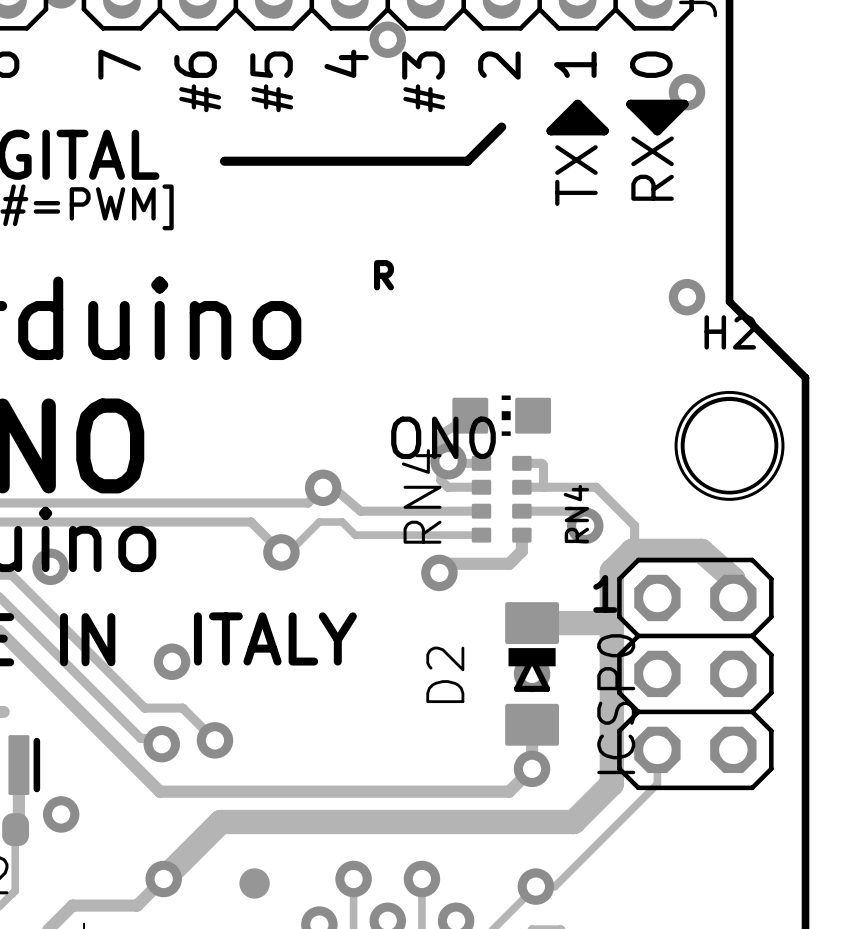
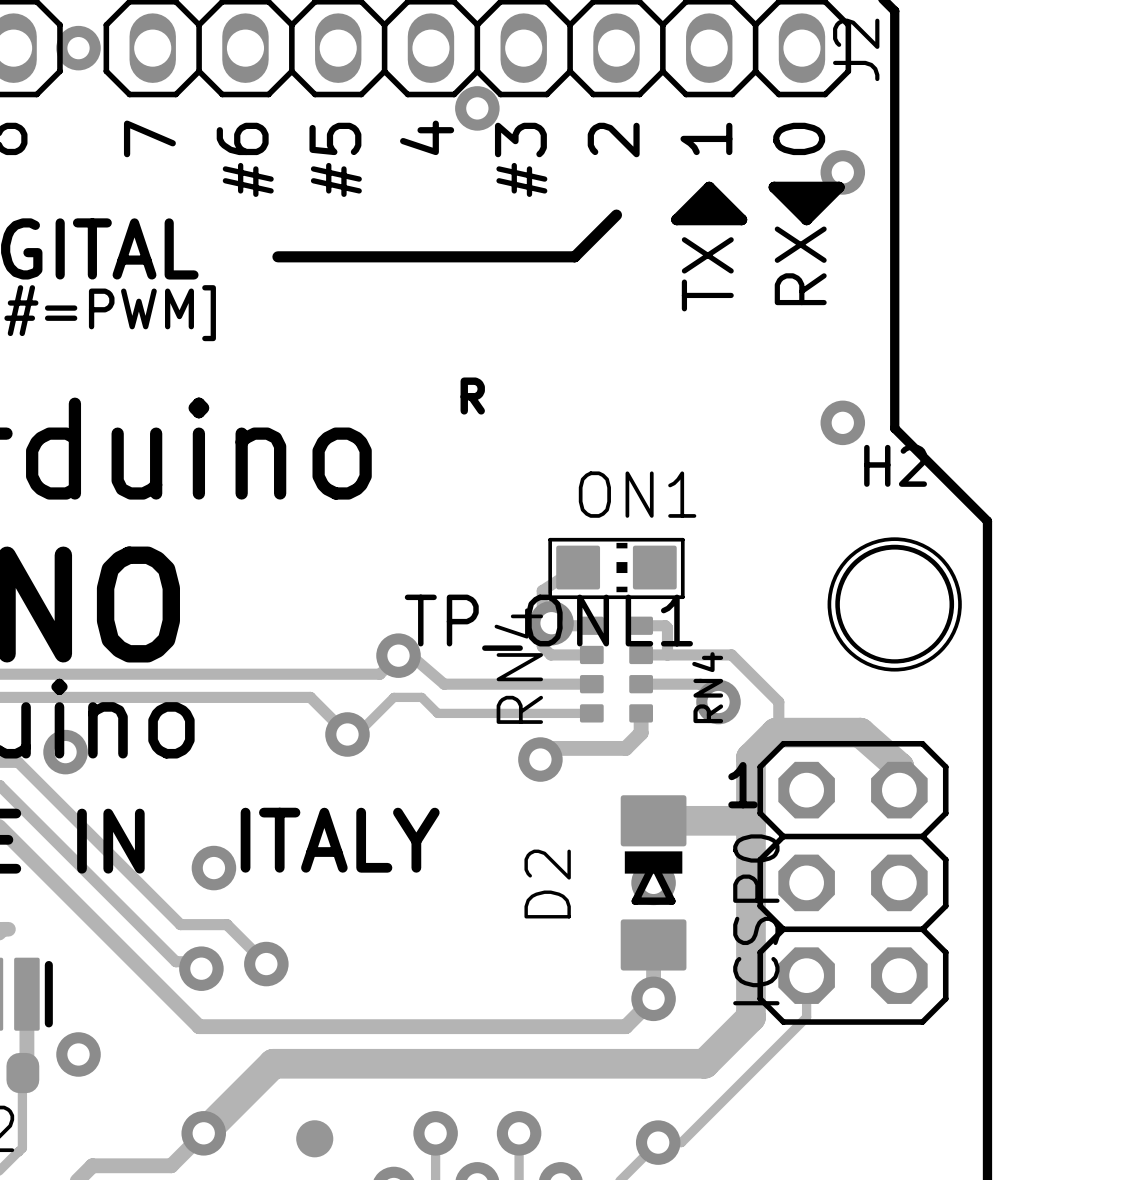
line: none -> (550, 539) (682, 539) (682, 597) (550, 597) (550, 539)
ON0 name: ON0 (443, 437) -> ON1 (637, 494)
TP_ONL1: none -> (548, 622)

